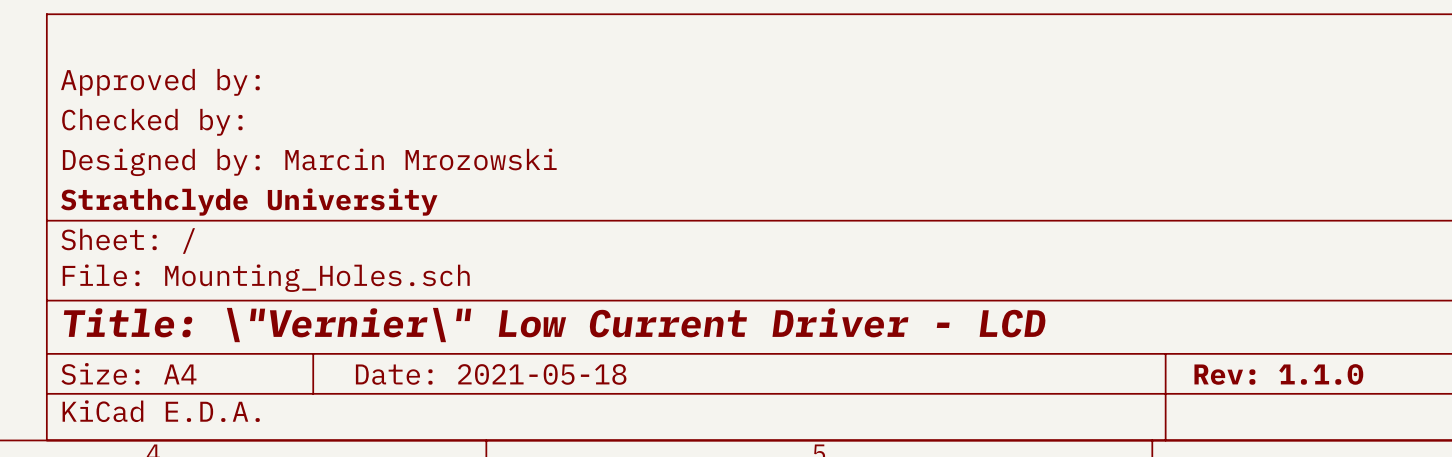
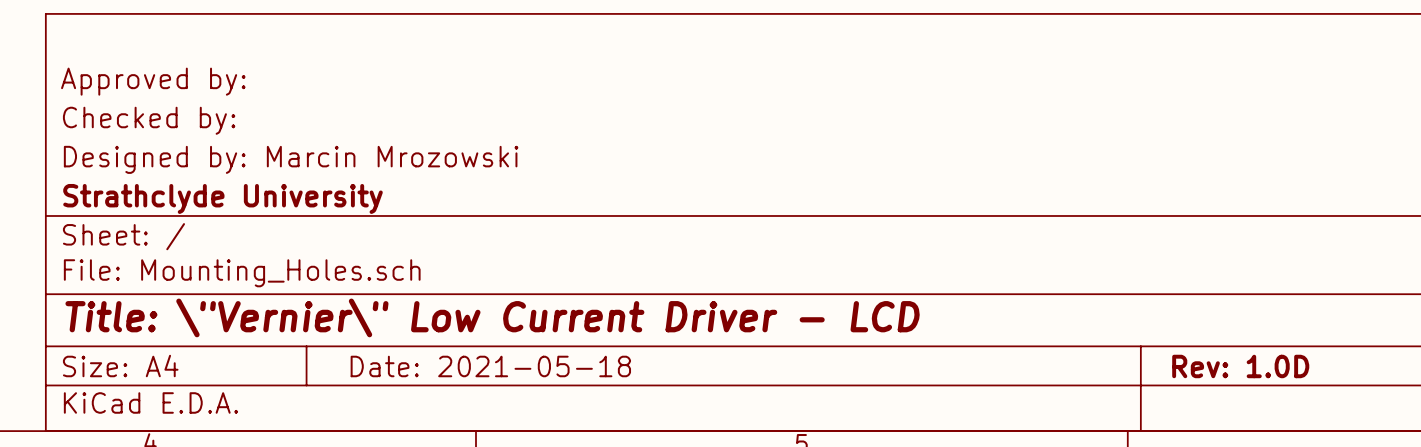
title block: Rev: 1.1.0 (1278, 374) -> Rev: 1.0D (1240, 366)

